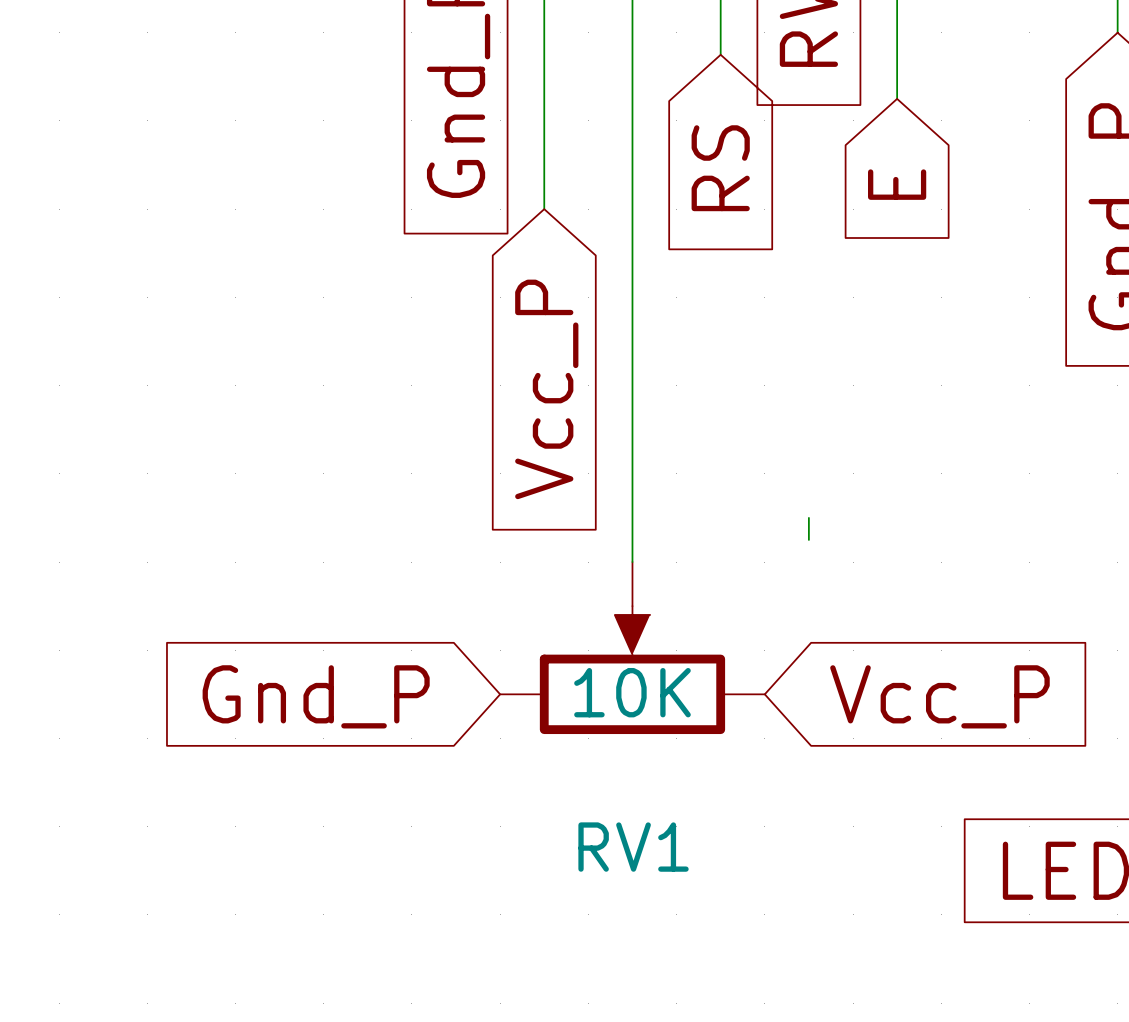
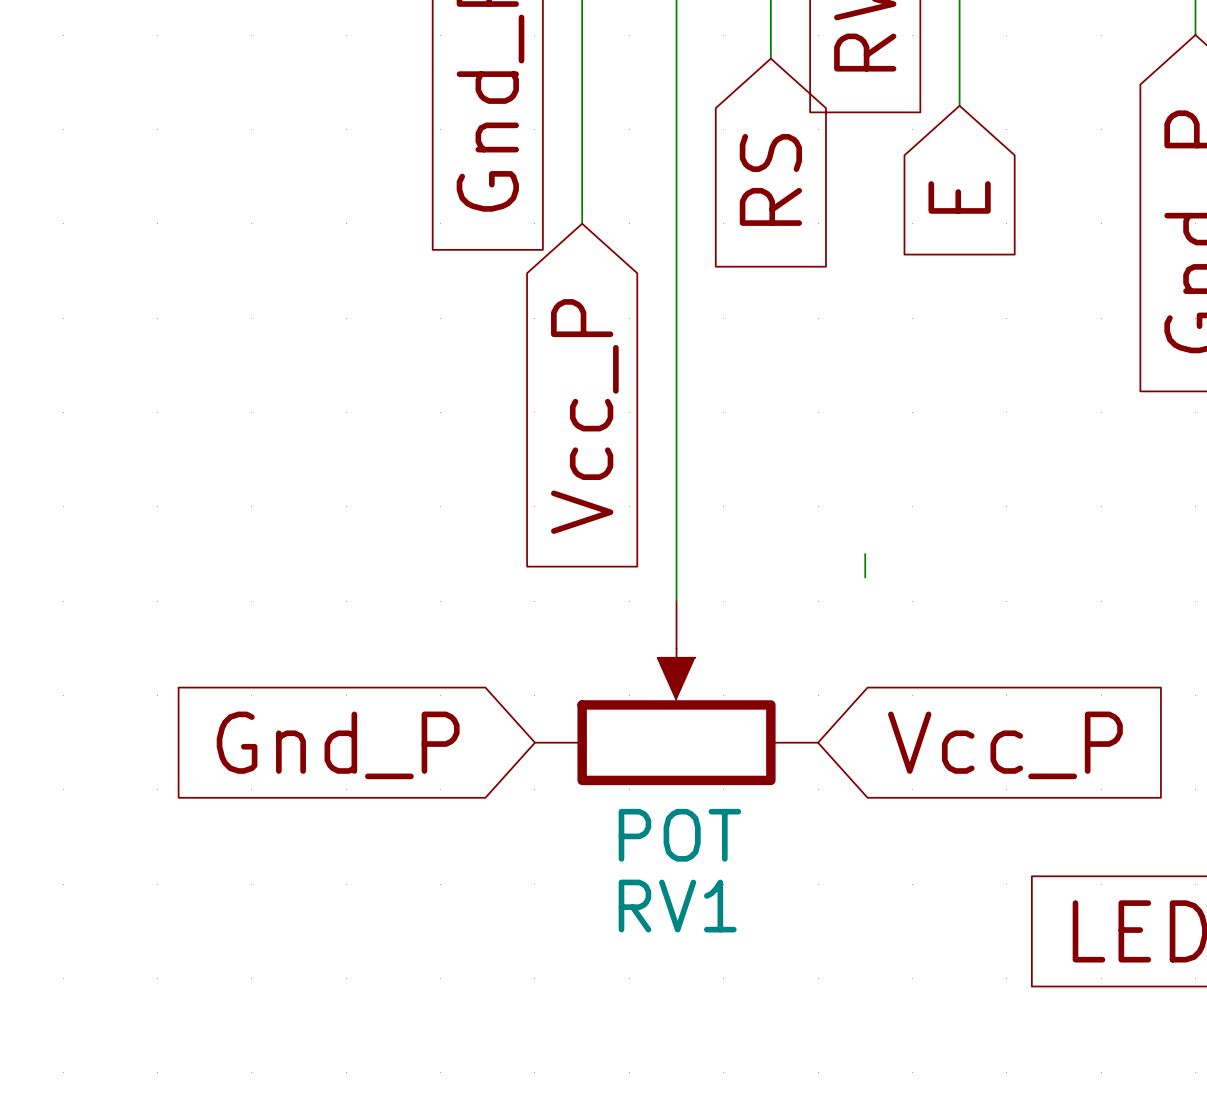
RV1 value: 10K (632, 692) -> POT (679, 835)

